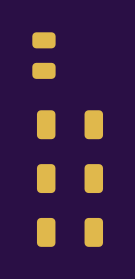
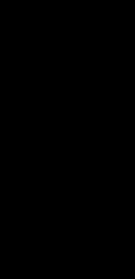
part: (43, 55) -> none
part: (69, 124) -> none
part: (69, 178) -> none
part: (69, 232) -> none

